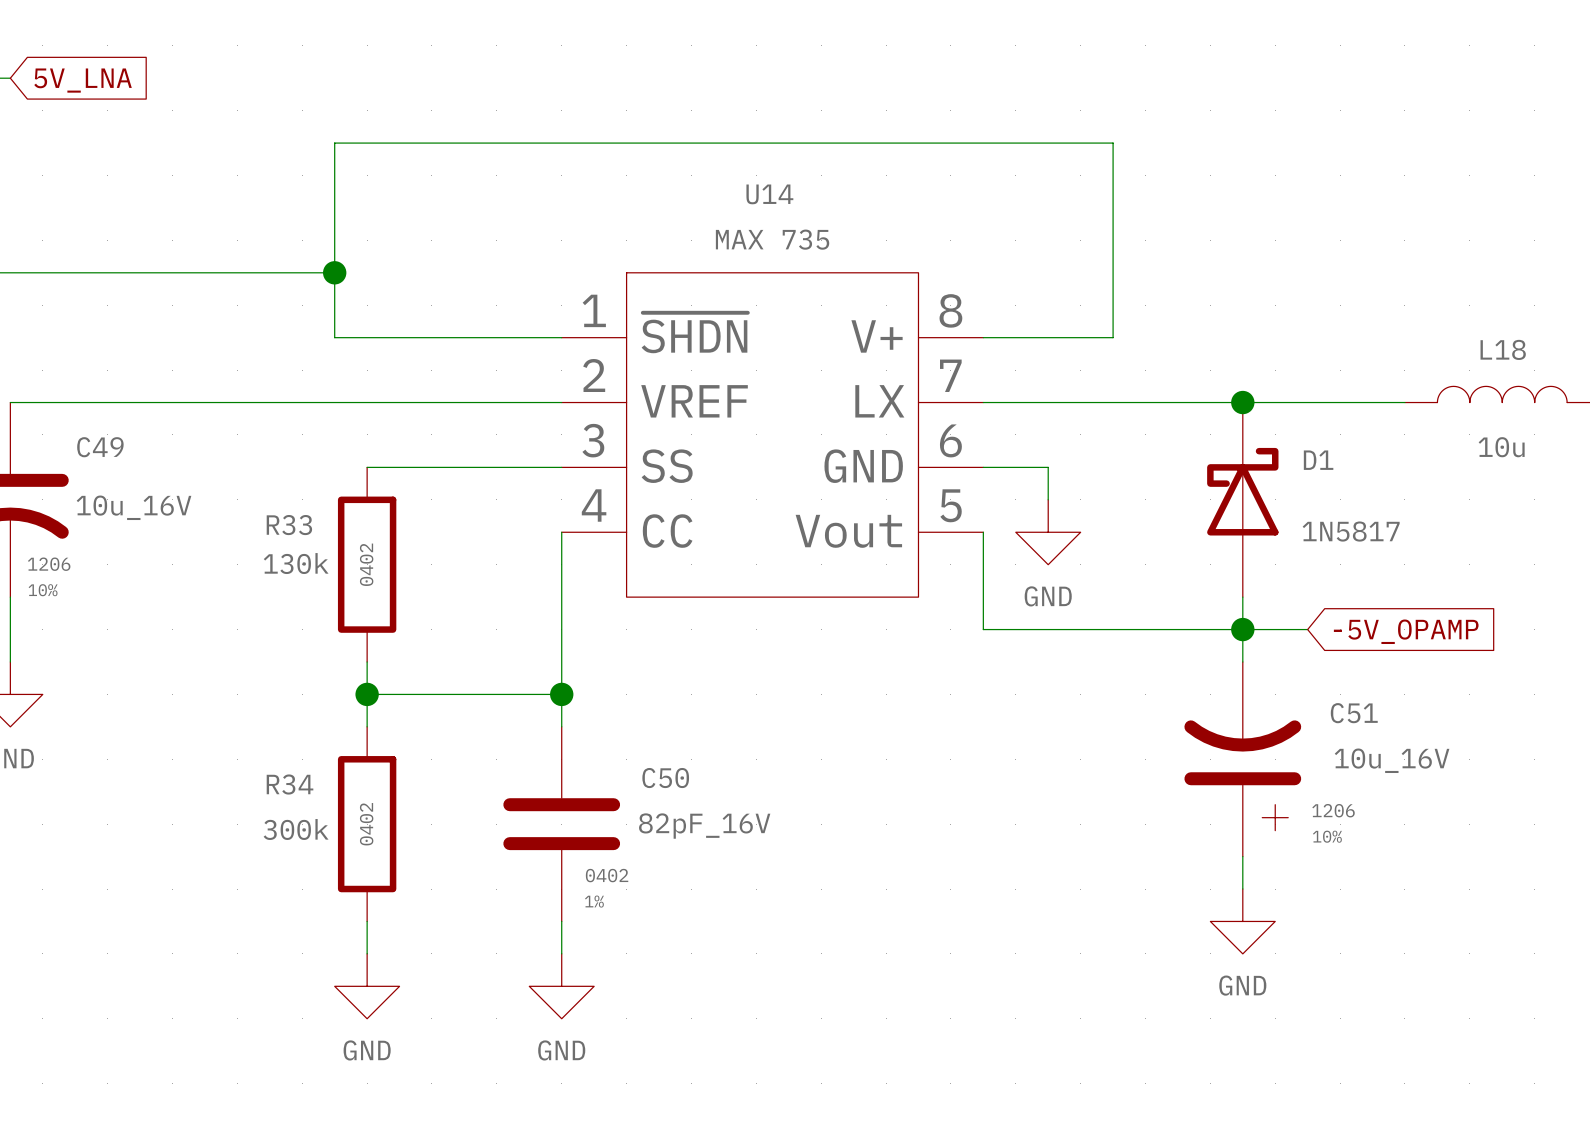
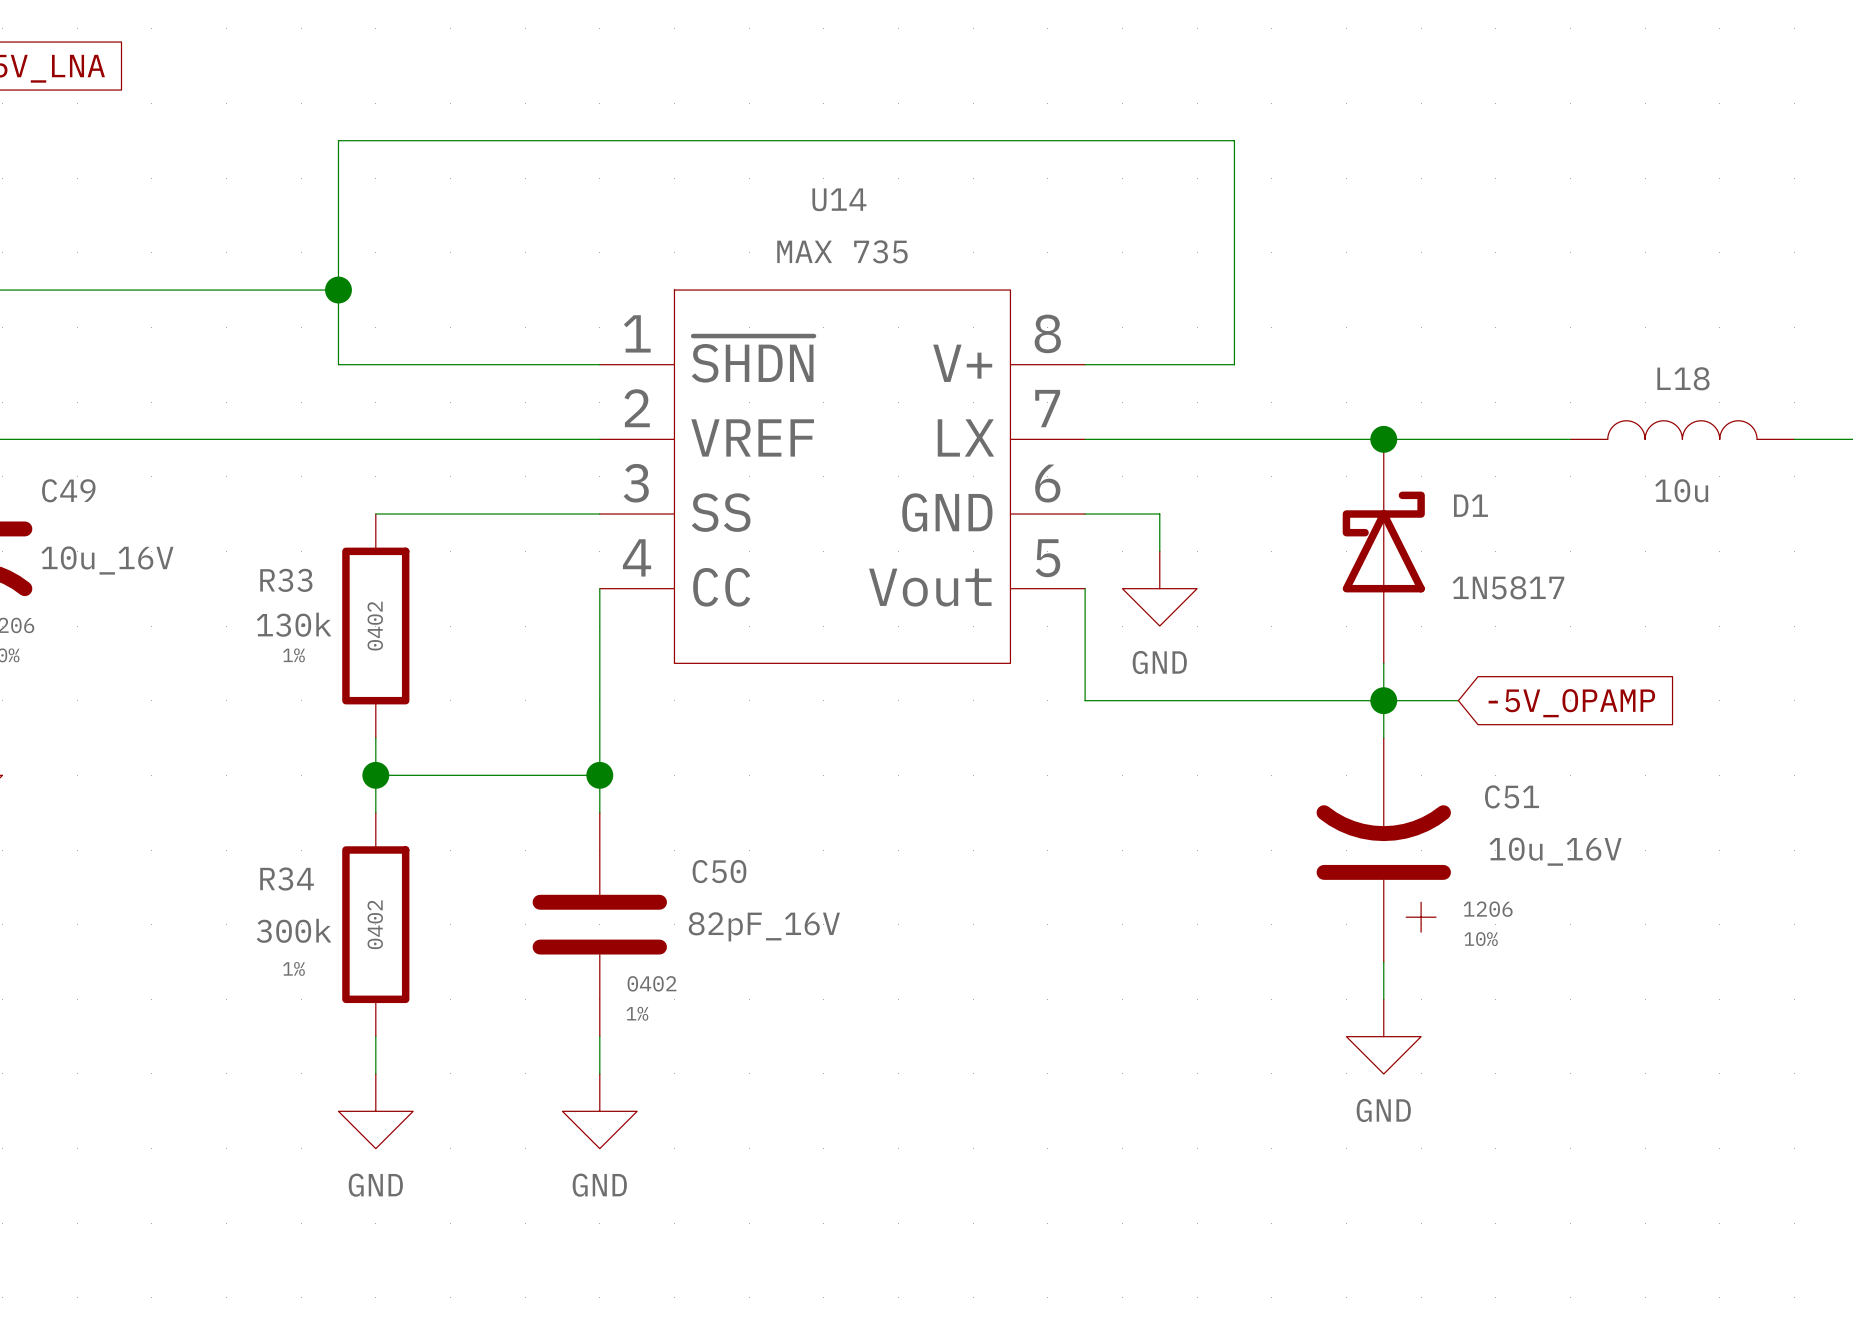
R33 text: none -> 1% (294, 655)
R34 text: none -> 1% (294, 968)

